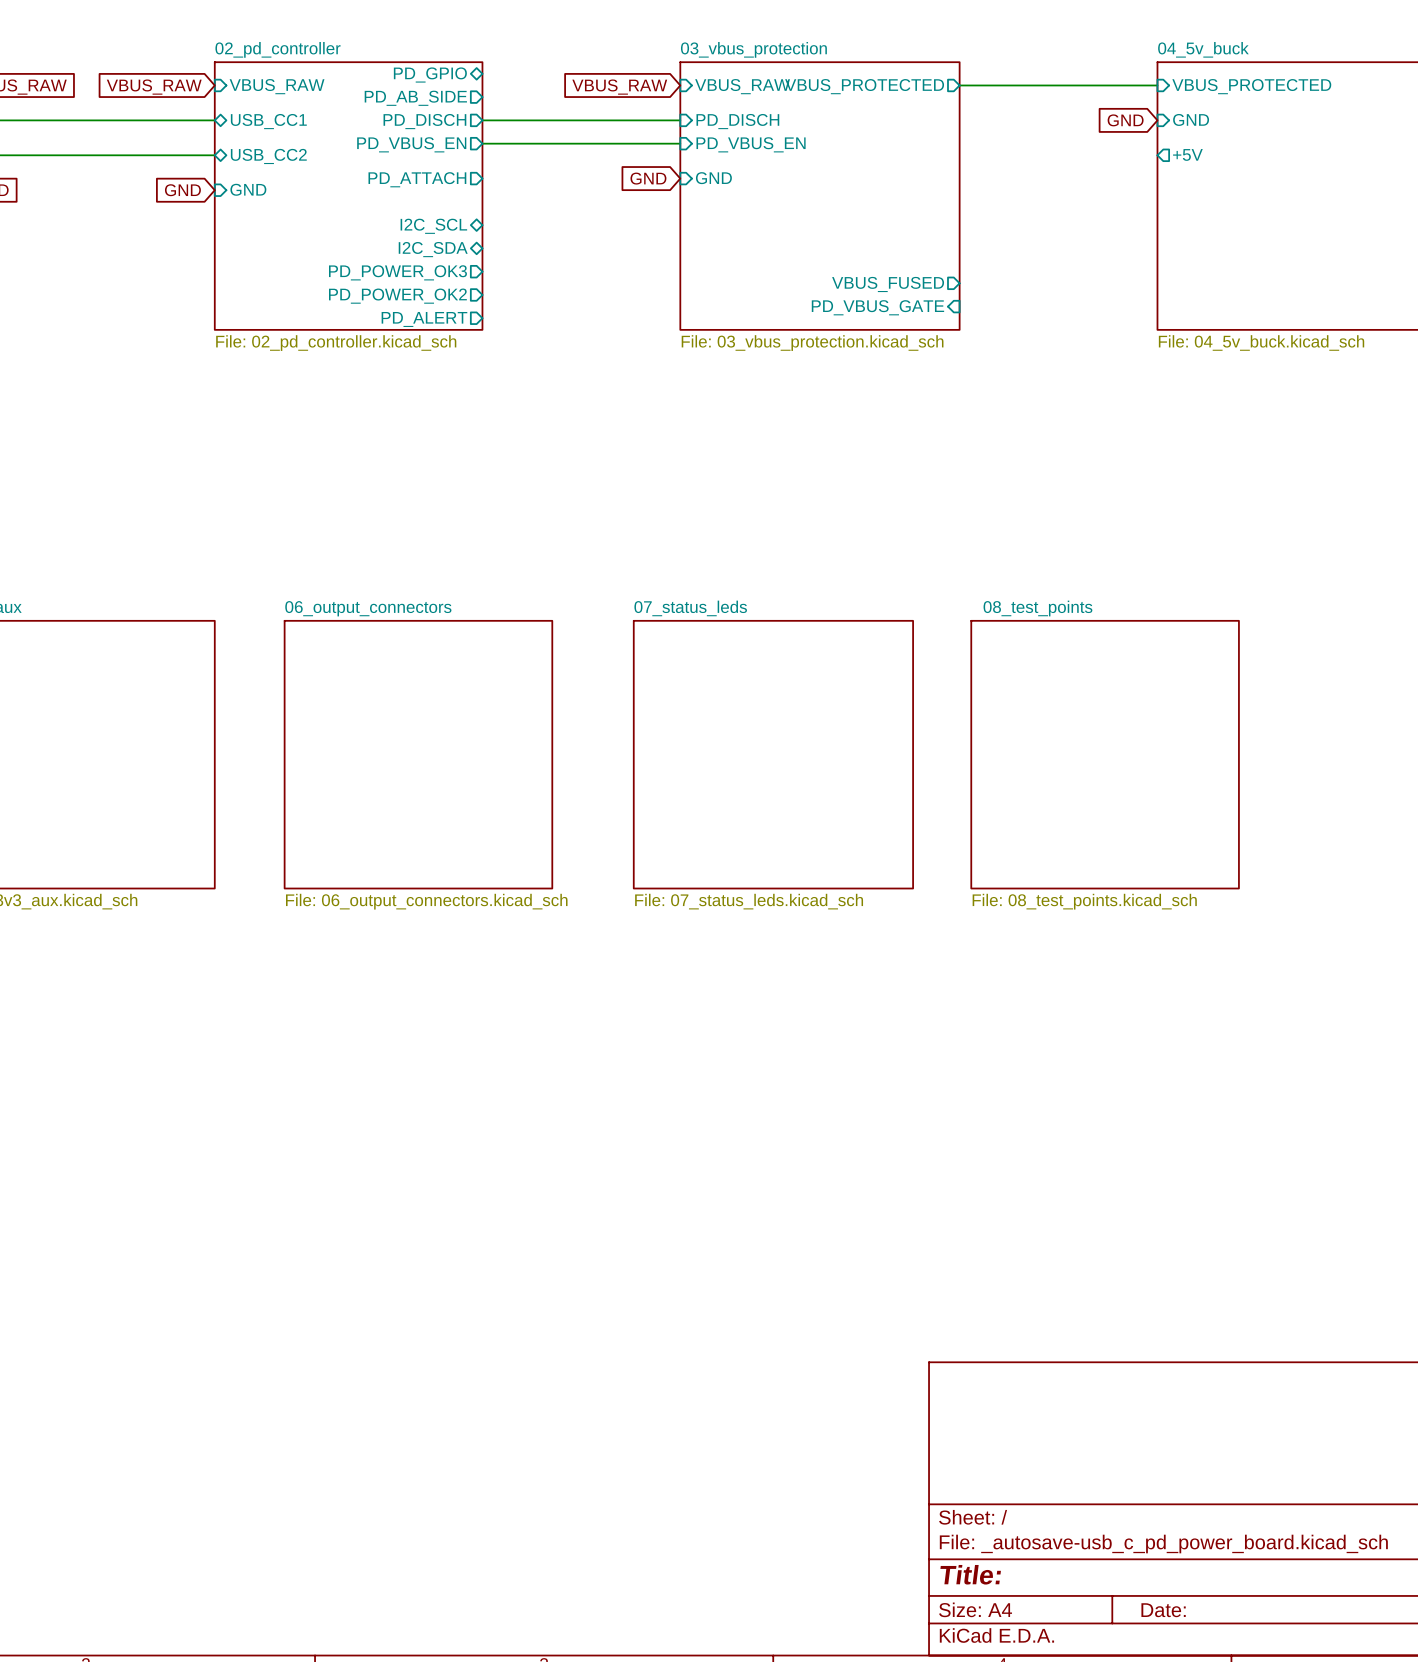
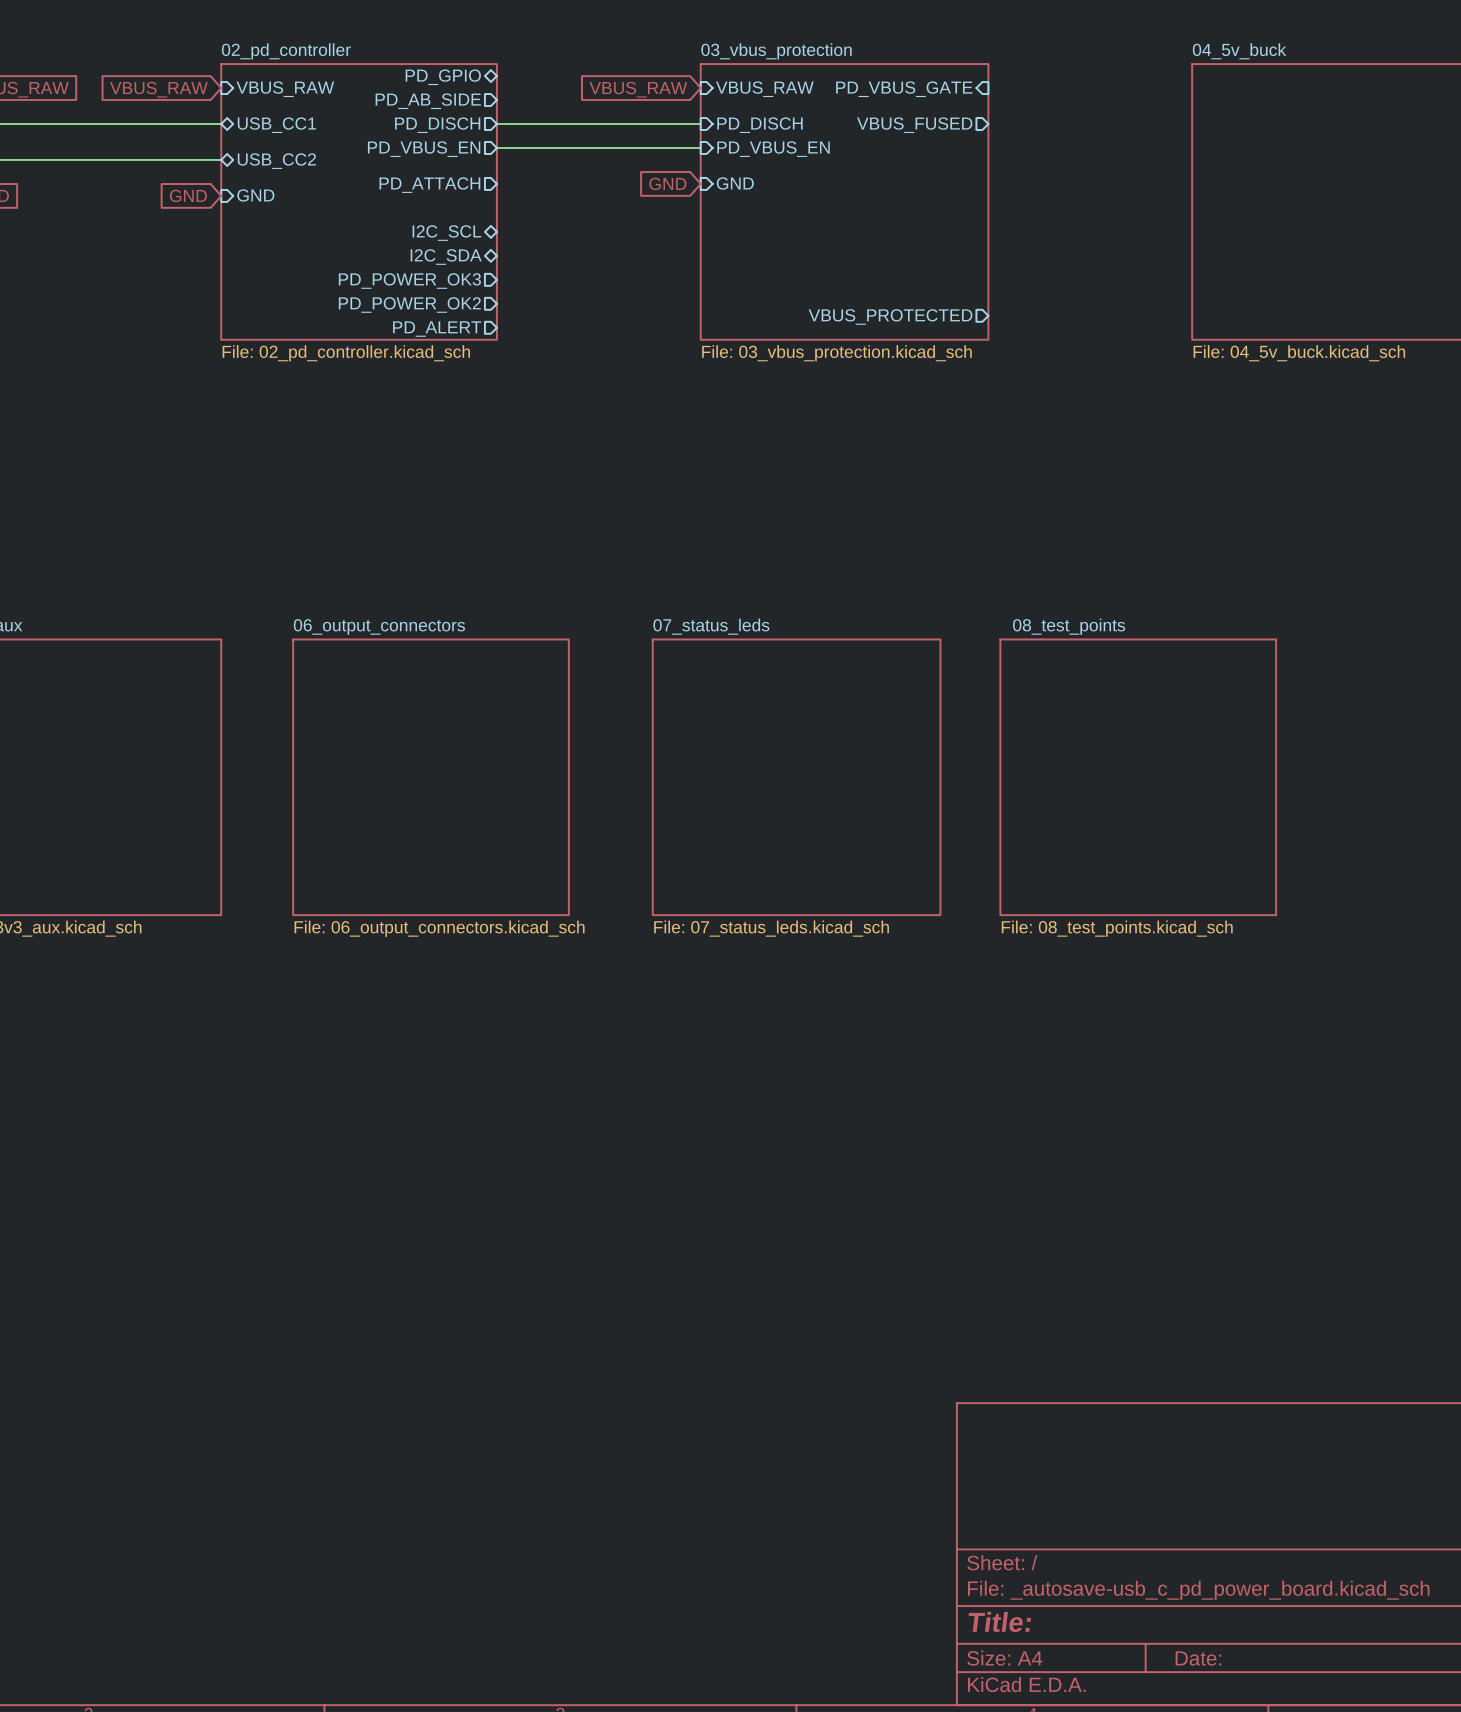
wire: (959, 85) (1157, 85) -> none
sheet pin shape: output (864, 86) -> input (904, 89)
sheet pin: VBUS_PROTECTED (864, 86) -> PD_VBUS_GATE (904, 89)
sheet pin: VBUS_PROTECTED (1251, 86) -> none
sheet pin: GND (1191, 119) -> none
global label: GND (1125, 120) -> none
sheet pin: +5V (1187, 154) -> none
sheet pin position: VBUS_FUSED (888, 284) -> VBUS_FUSED (914, 125)
sheet pin shape: input (877, 307) -> output (890, 316)
sheet pin: PD_VBUS_GATE (877, 307) -> VBUS_PROTECTED (890, 316)

